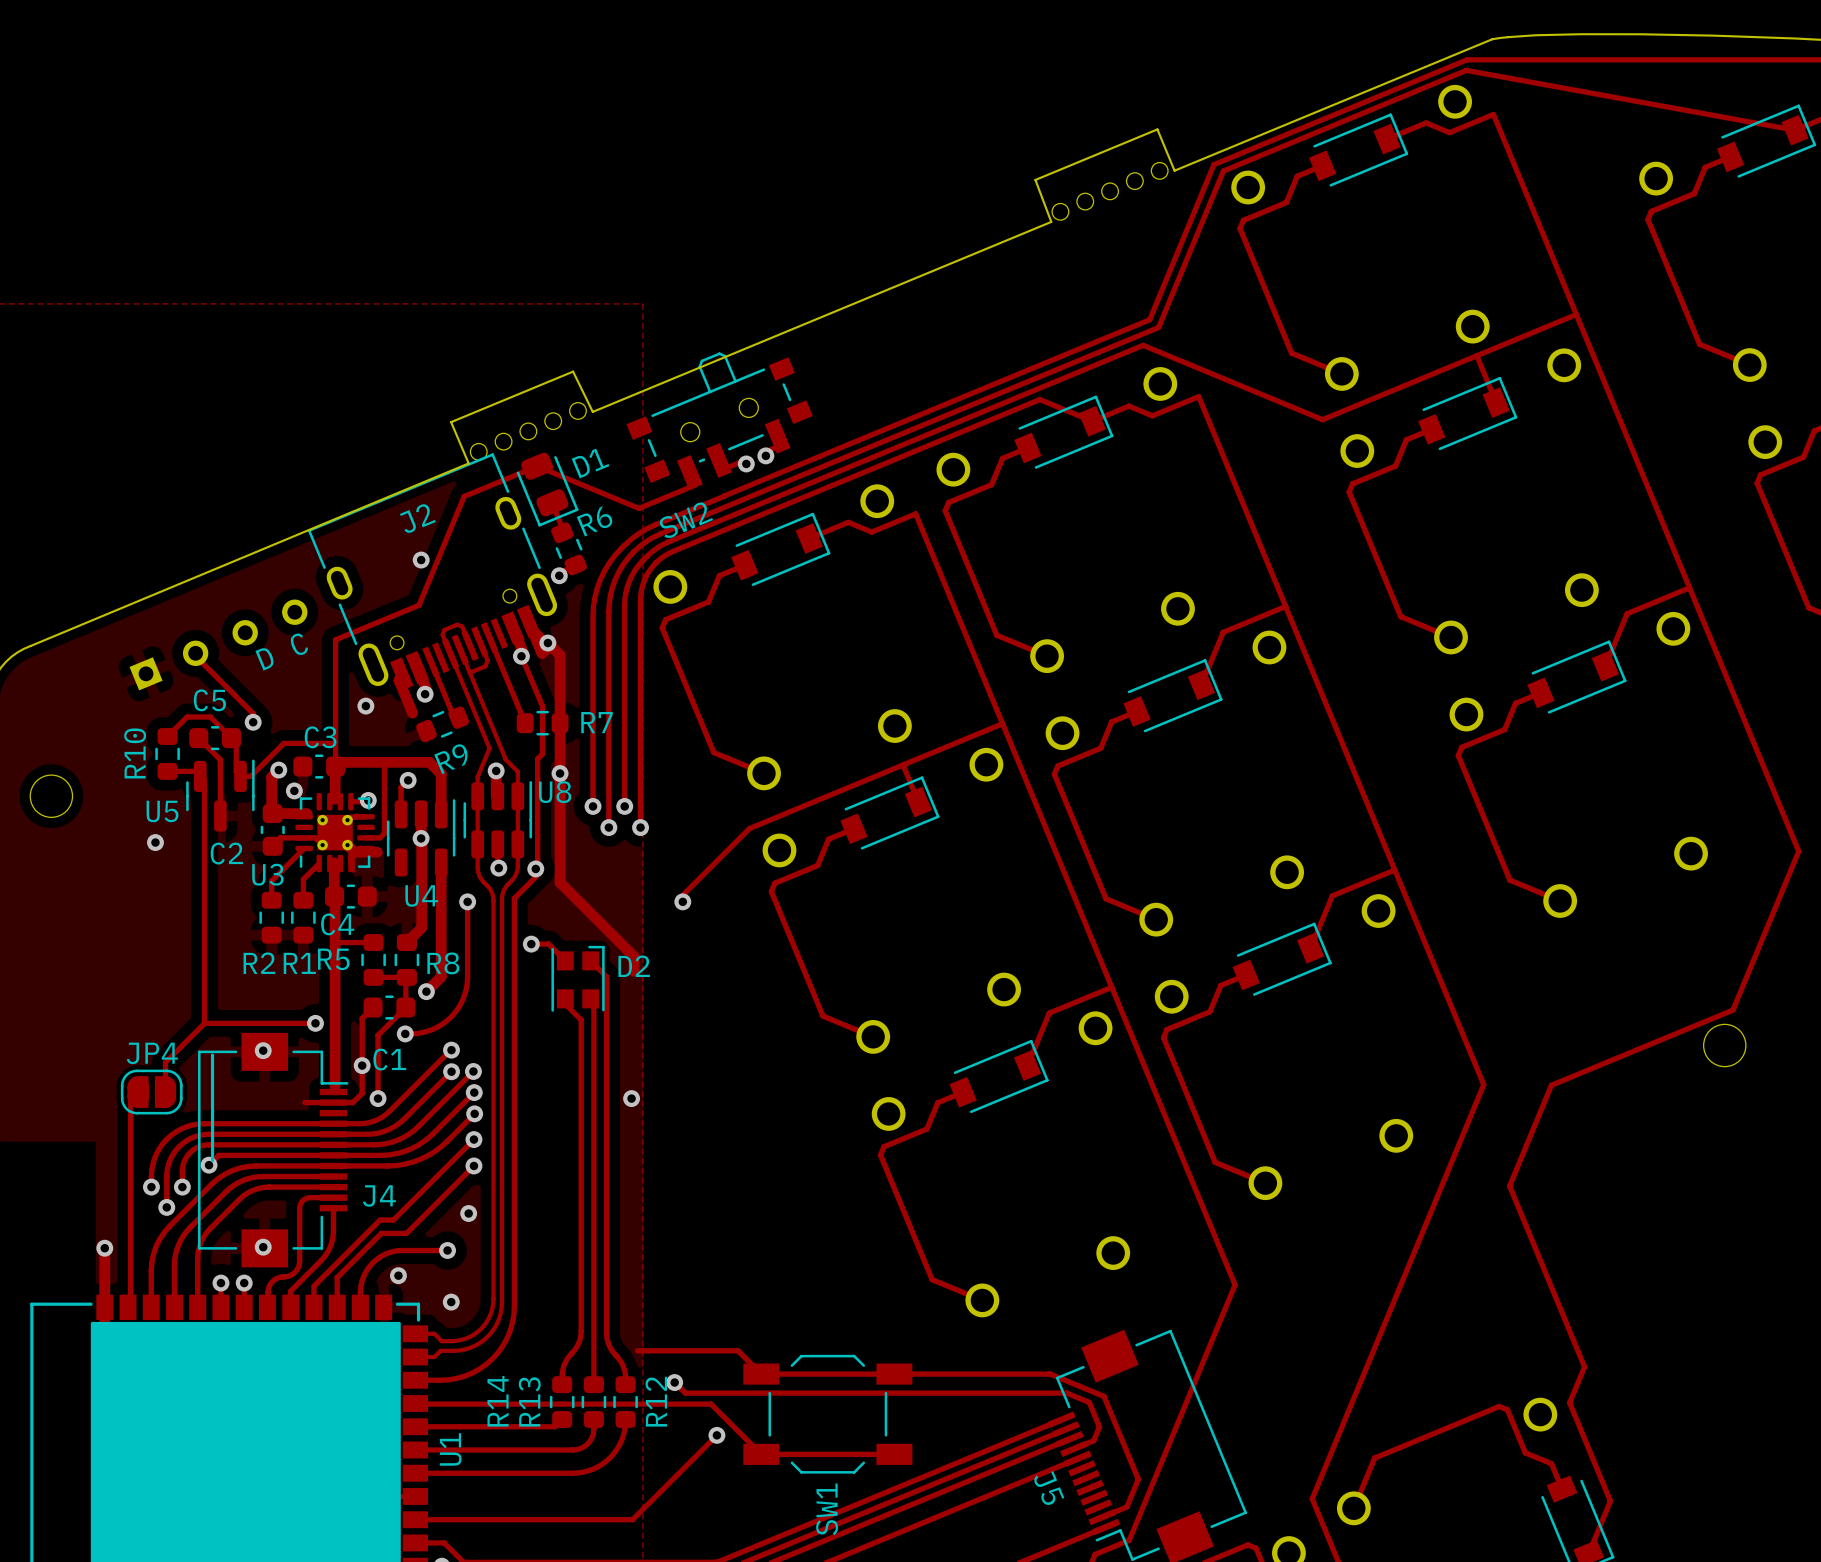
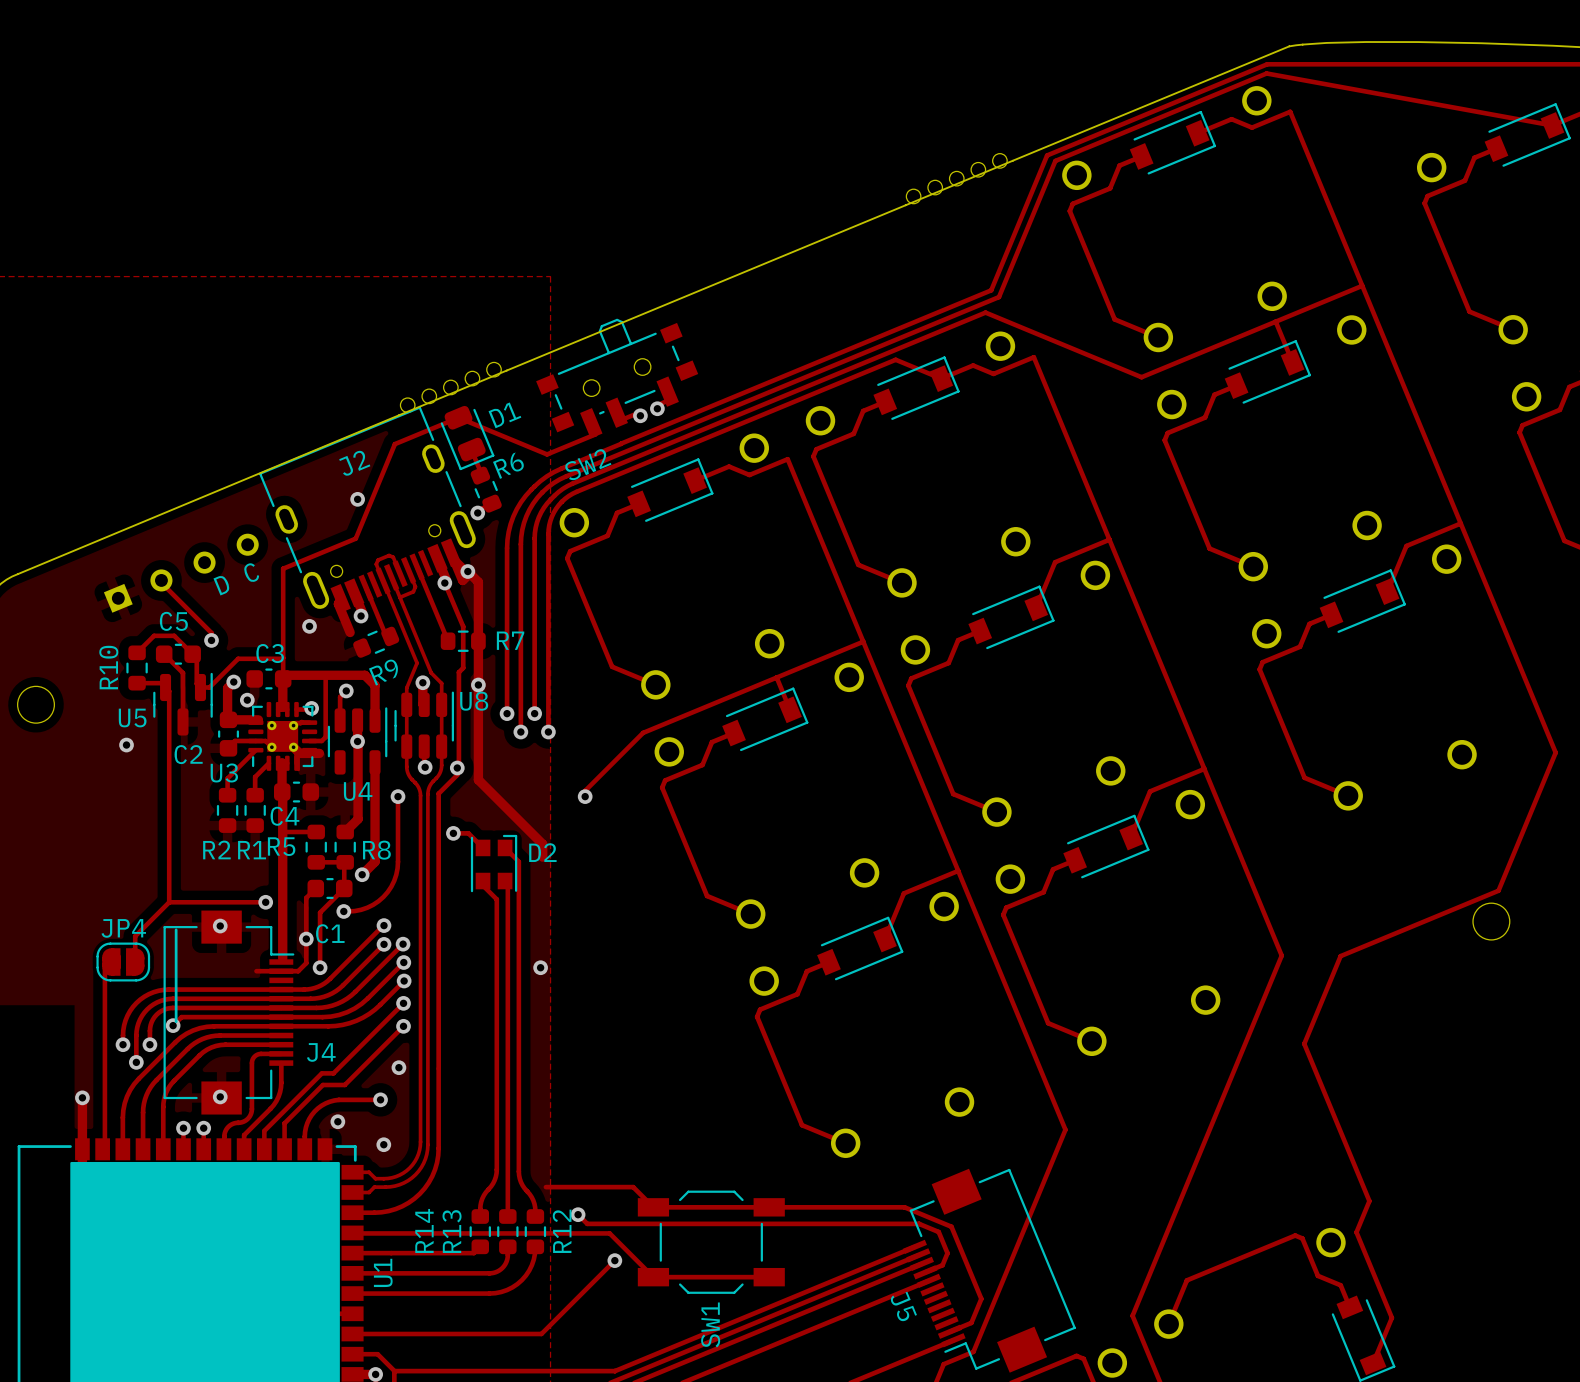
board edge: (1174, 170) (1157, 129) (1035, 179) (1051, 221) -> (1012, 160) (905, 205)
board edge: (592, 411) (573, 371) (451, 422) (468, 463) -> (506, 370) (398, 415)

